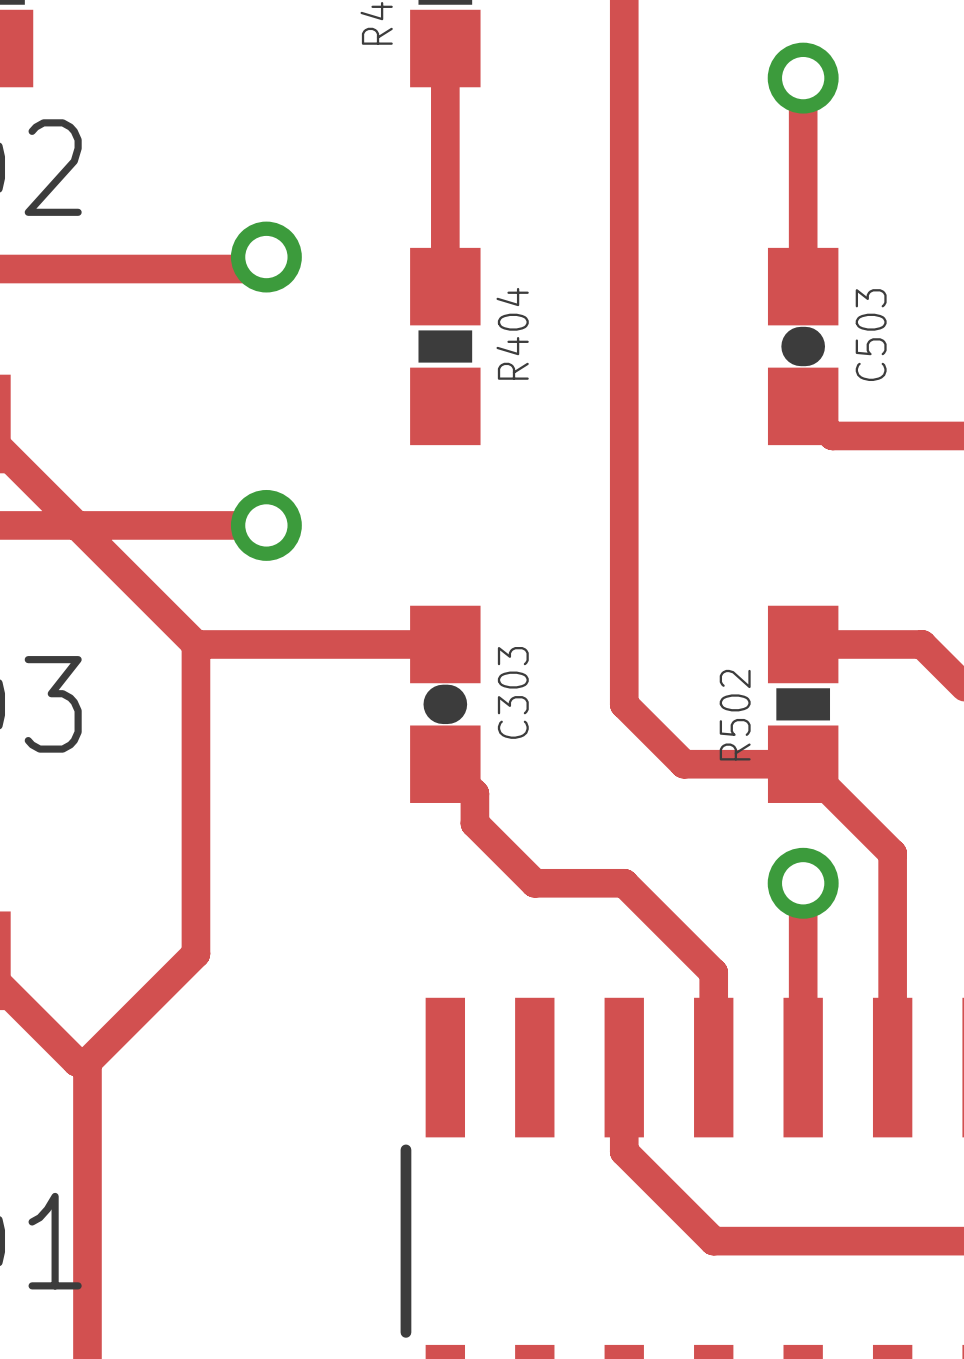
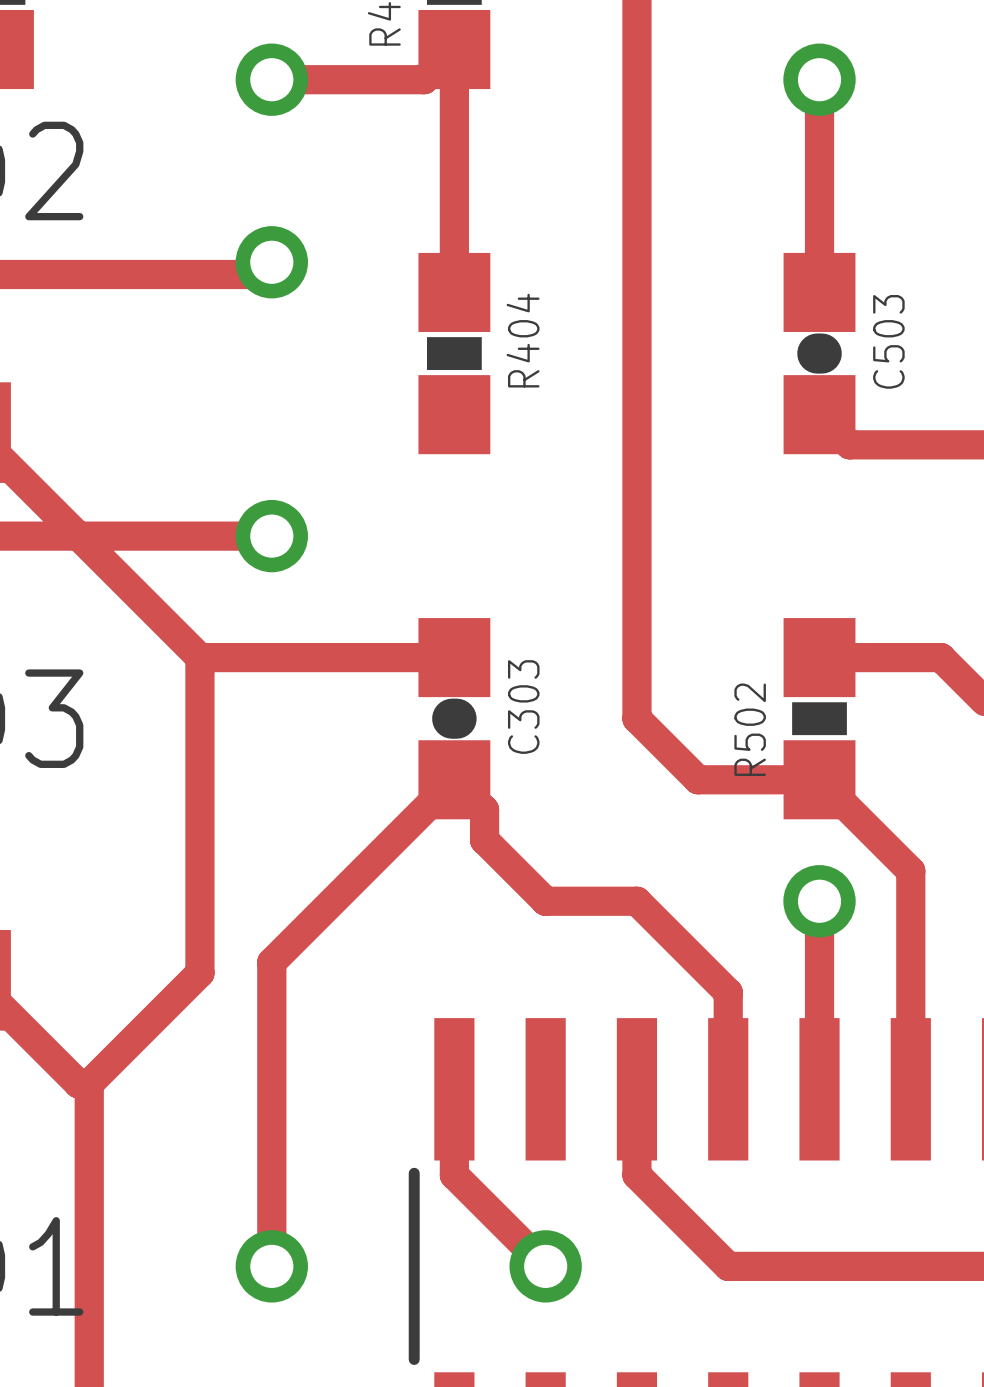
track: none -> (454, 49) (424, 79) (271, 79)
via: none -> (271, 79)
track: none -> (454, 779) (271, 962) (271, 1266)
track: none -> (454, 1089) (454, 1175) (545, 1266)
via: none -> (271, 1266)
via: none -> (545, 1266)

